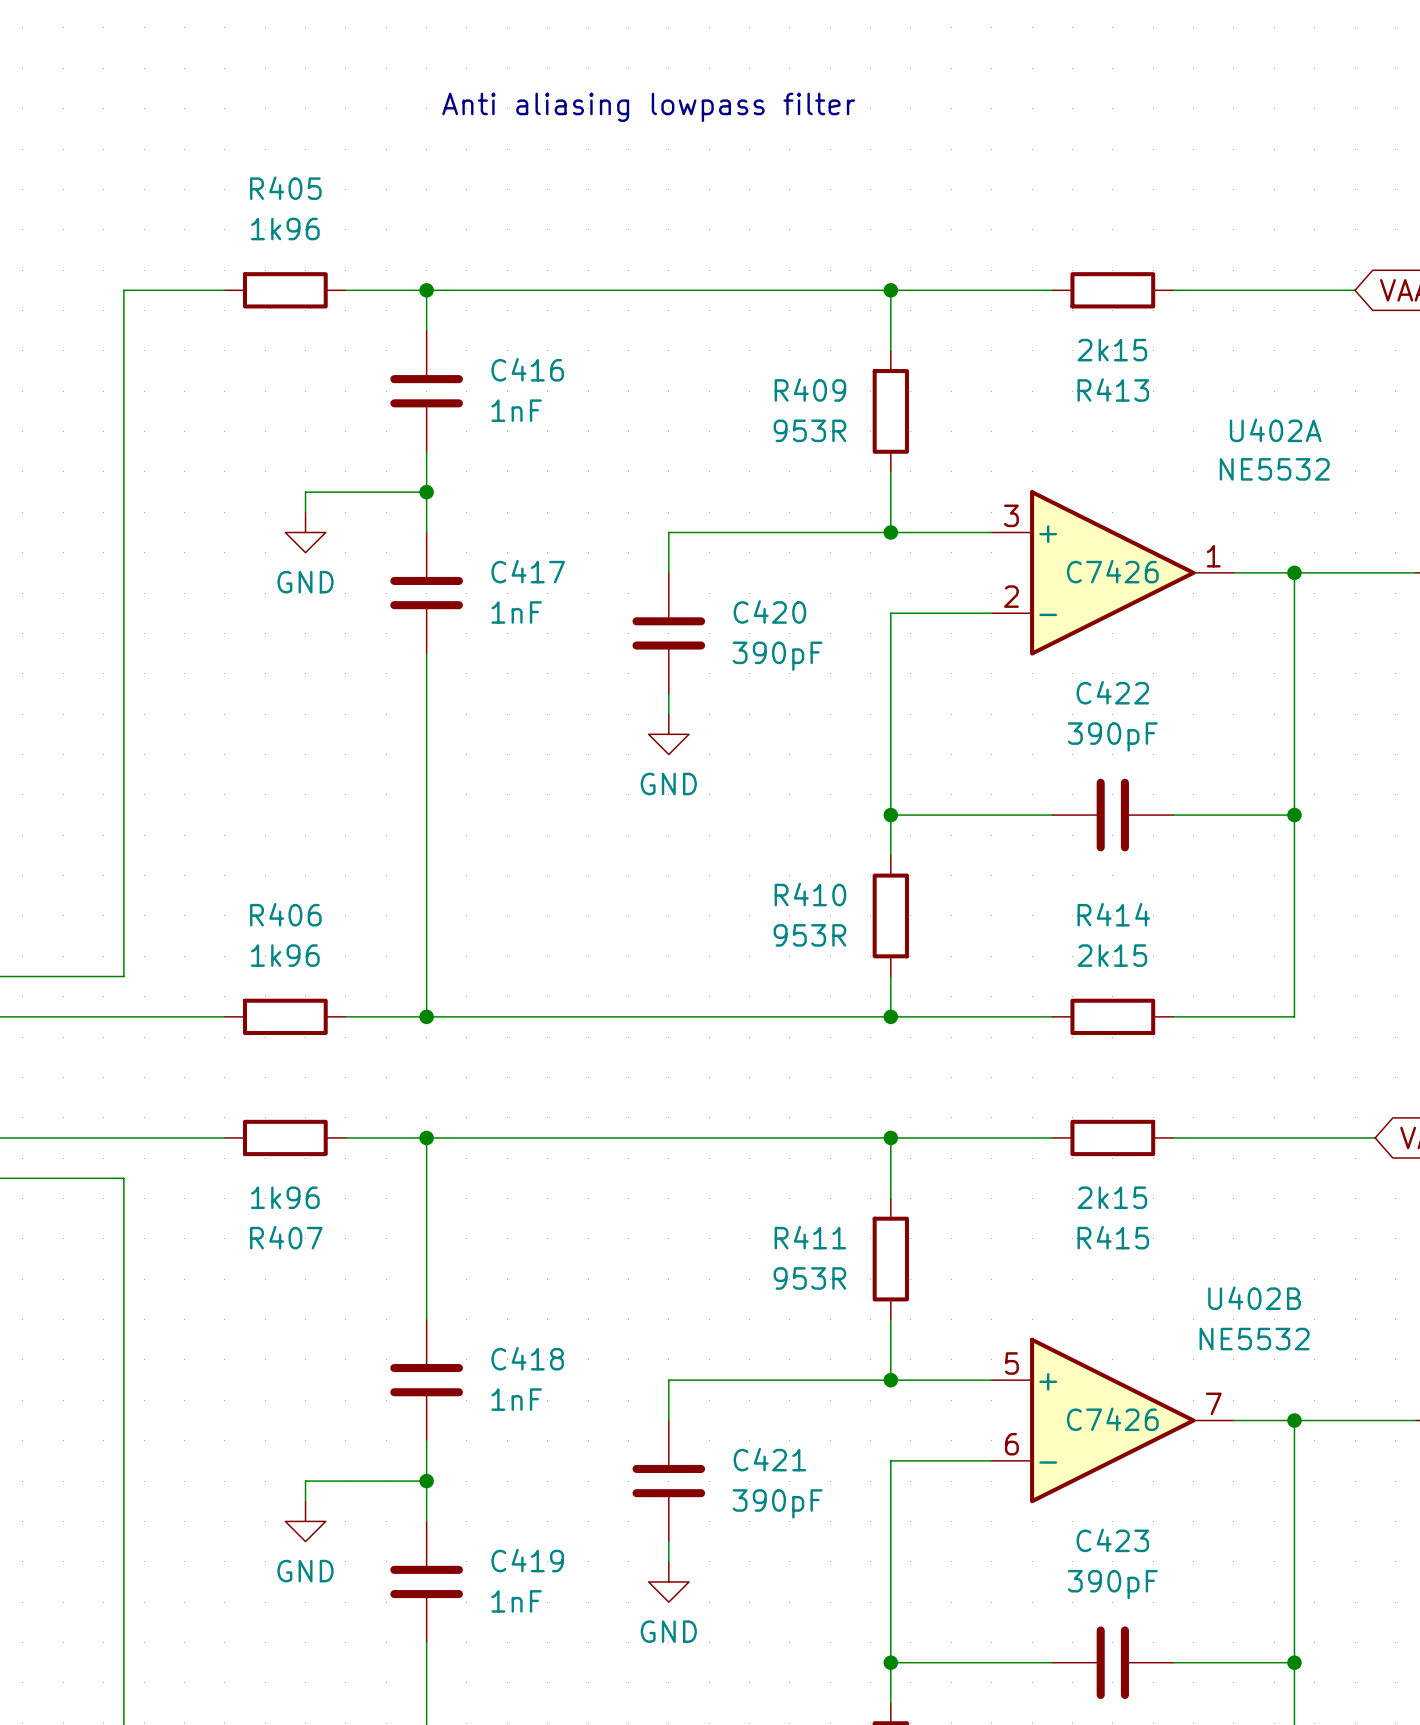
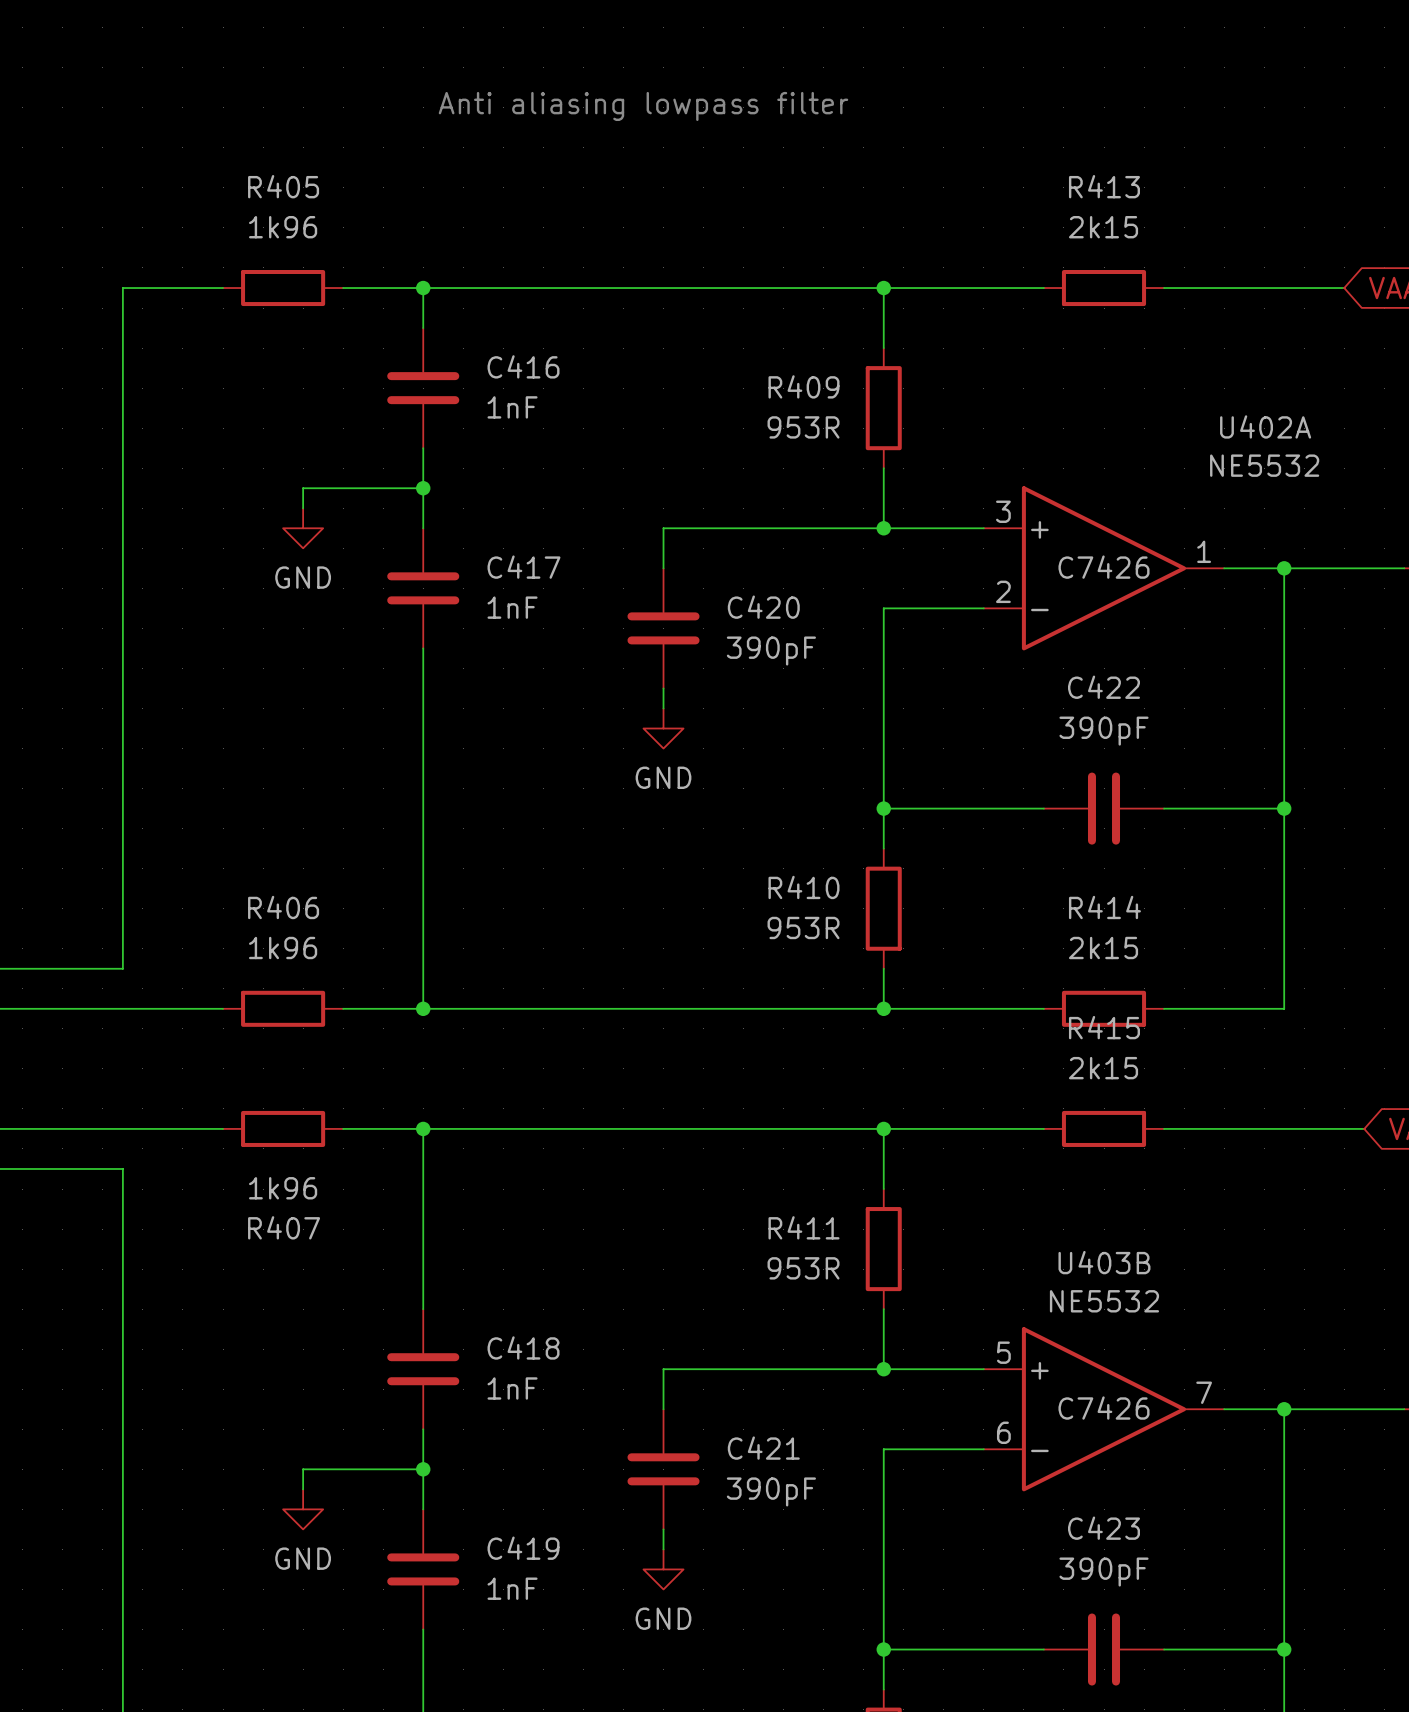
R413 value position: 2k15 (1112, 350) -> 2k15 (1103, 227)
R413 name position: R413 (1113, 389) -> R413 (1104, 186)
R415 value position: 2k15 (1112, 1197) -> 2k15 (1103, 1068)
R415 name position: R415 (1113, 1237) -> R415 (1104, 1027)
U402B name: U402B (1254, 1298) -> U403B (1104, 1262)
U402B value position: NE5532 (1254, 1339) -> NE5532 (1104, 1301)

